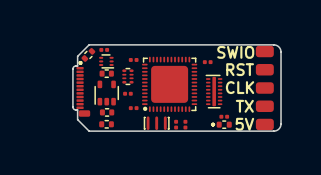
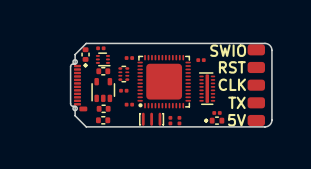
part rotation: 0° (86, 56) -> 45° counterclockwise (85, 57)
part footprint: [76, 66, 91, 117] -> [73, 59, 88, 112]

